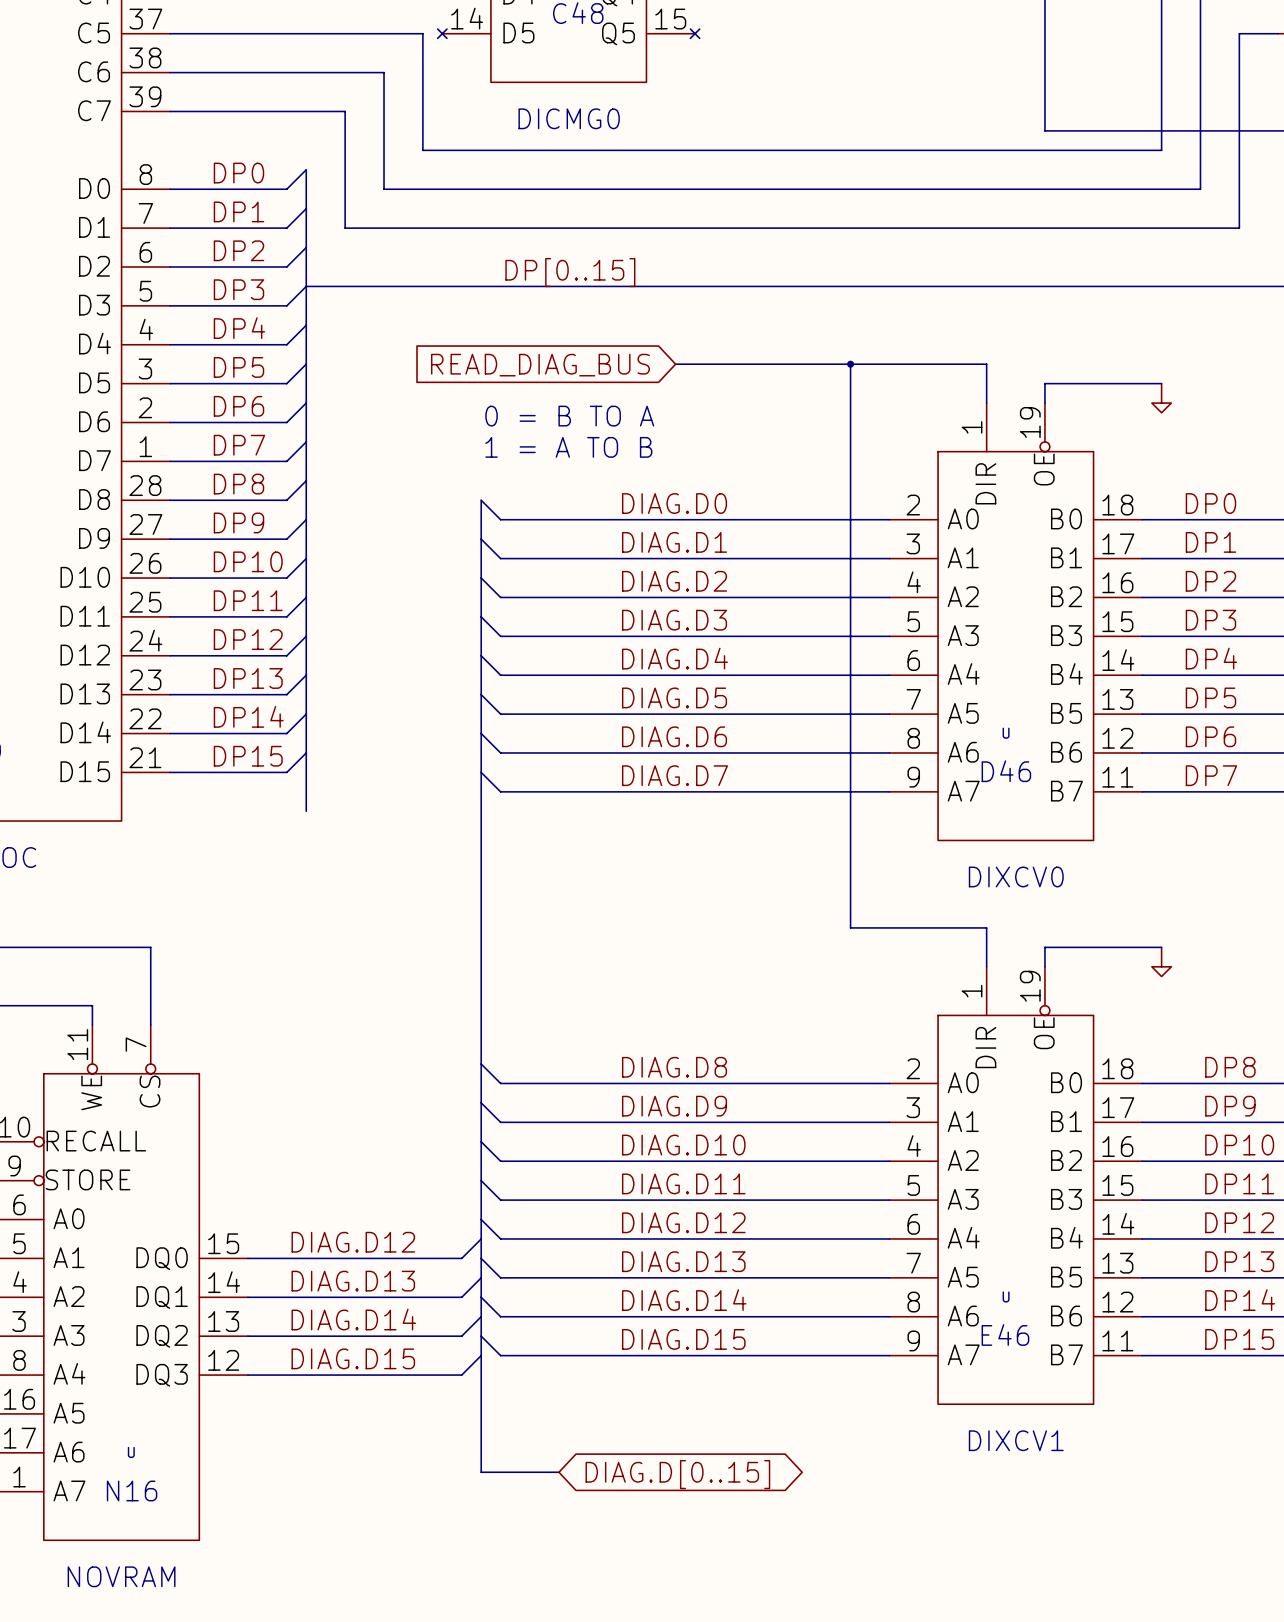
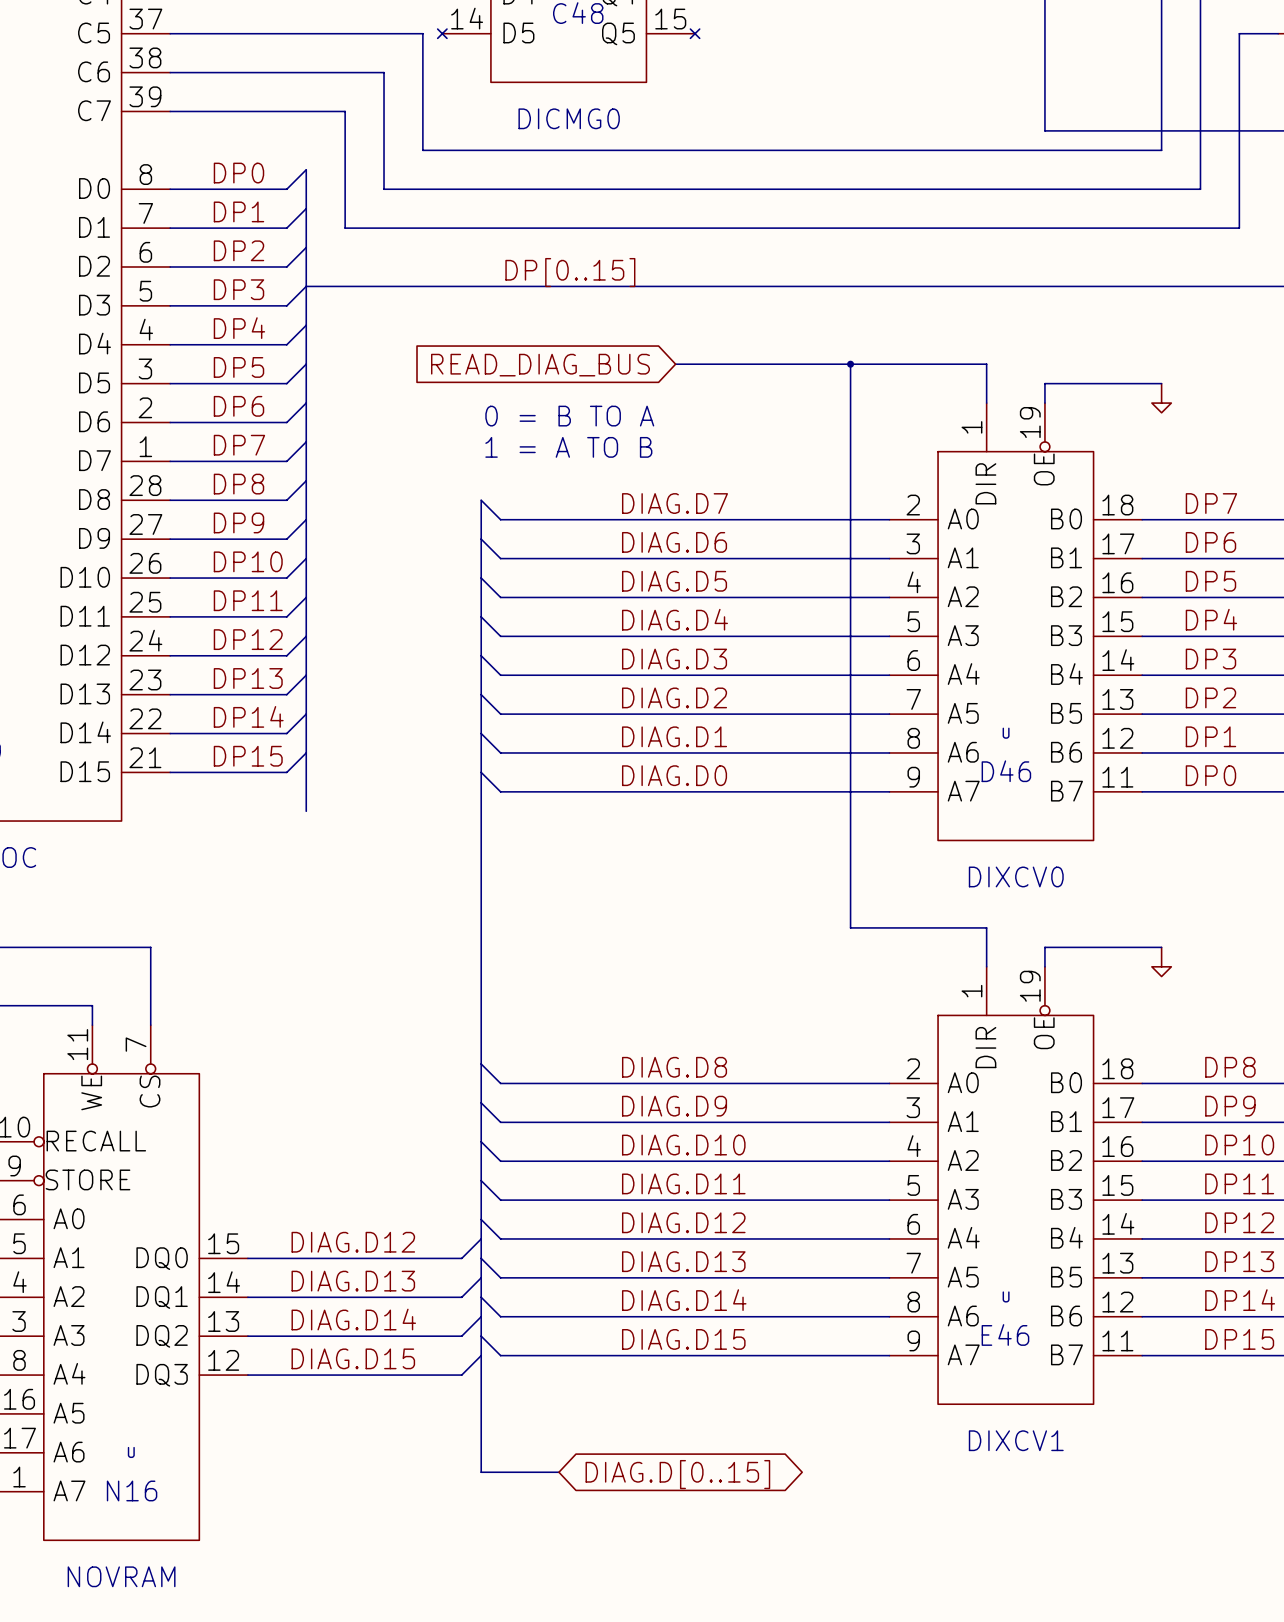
label: DIAG.D0 (674, 503) -> DIAG.D7 (674, 503)
label: DP0 (1210, 503) -> DP7 (1211, 503)
label: DIAG.D1 (674, 542) -> DIAG.D6 (674, 542)
label: DP1 (1210, 542) -> DP6 (1210, 542)
label: DIAG.D2 (674, 581) -> DIAG.D5 (674, 581)
label: DP2 (1210, 581) -> DP5 (1210, 581)
label: DIAG.D3 (674, 620) -> DIAG.D4 (674, 619)
label: DP3 (1210, 620) -> DP4 (1211, 619)
label: DIAG.D4 (674, 658) -> DIAG.D3 (674, 659)
label: DP4 (1211, 658) -> DP3 (1210, 659)
label: DIAG.D5 (674, 697) -> DIAG.D2 (674, 697)
label: DP5 (1210, 697) -> DP2 (1210, 697)
label: DIAG.D6 (674, 736) -> DIAG.D1 (674, 736)
label: DP6 (1210, 736) -> DP1 (1210, 736)
label: DIAG.D7 (674, 775) -> DIAG.D0 (674, 775)
label: DP7 (1211, 775) -> DP0 (1210, 775)

